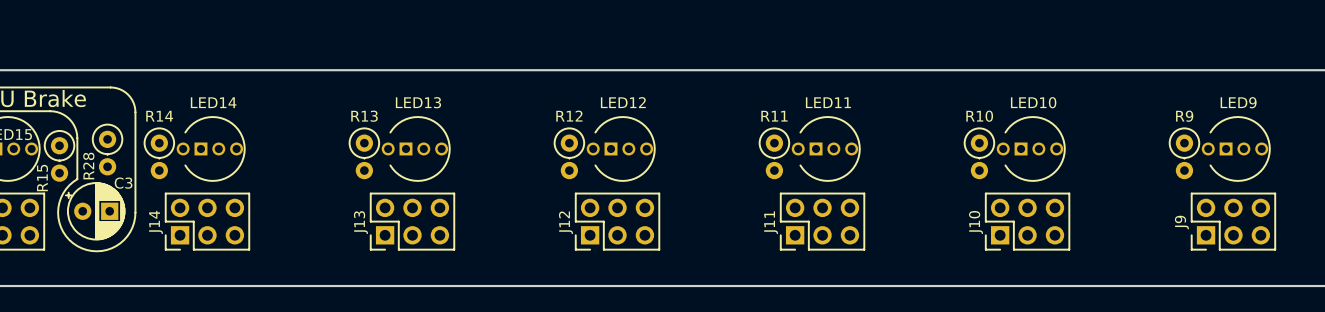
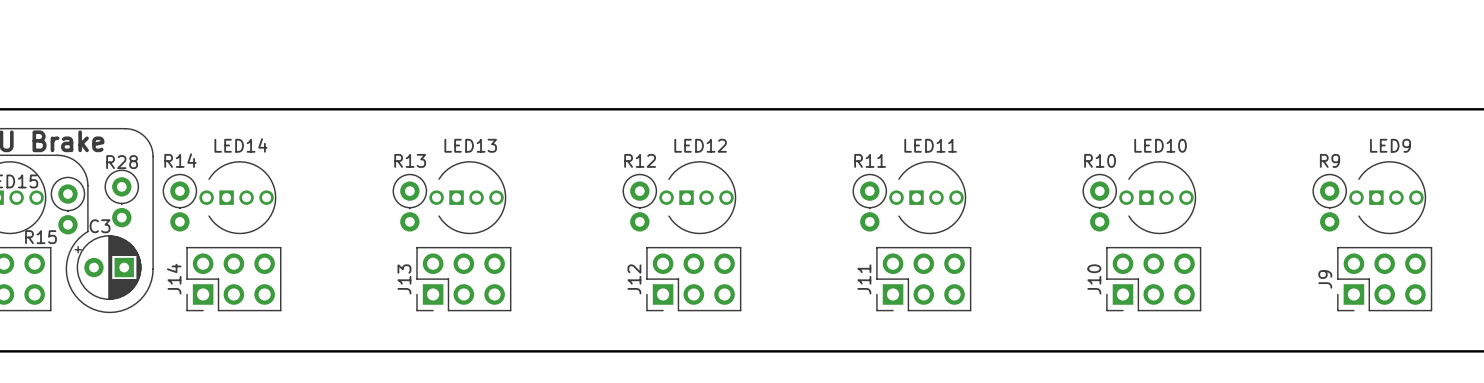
R28 name rotation: 0° (88, 166) -> 90° clockwise (122, 162)
R28 name position: R28 (88, 166) -> R28 (122, 162)
R15 name rotation: 0° (42, 178) -> 90° clockwise (41, 237)
C3 name position: C3 (123, 183) -> C3 (100, 226)

